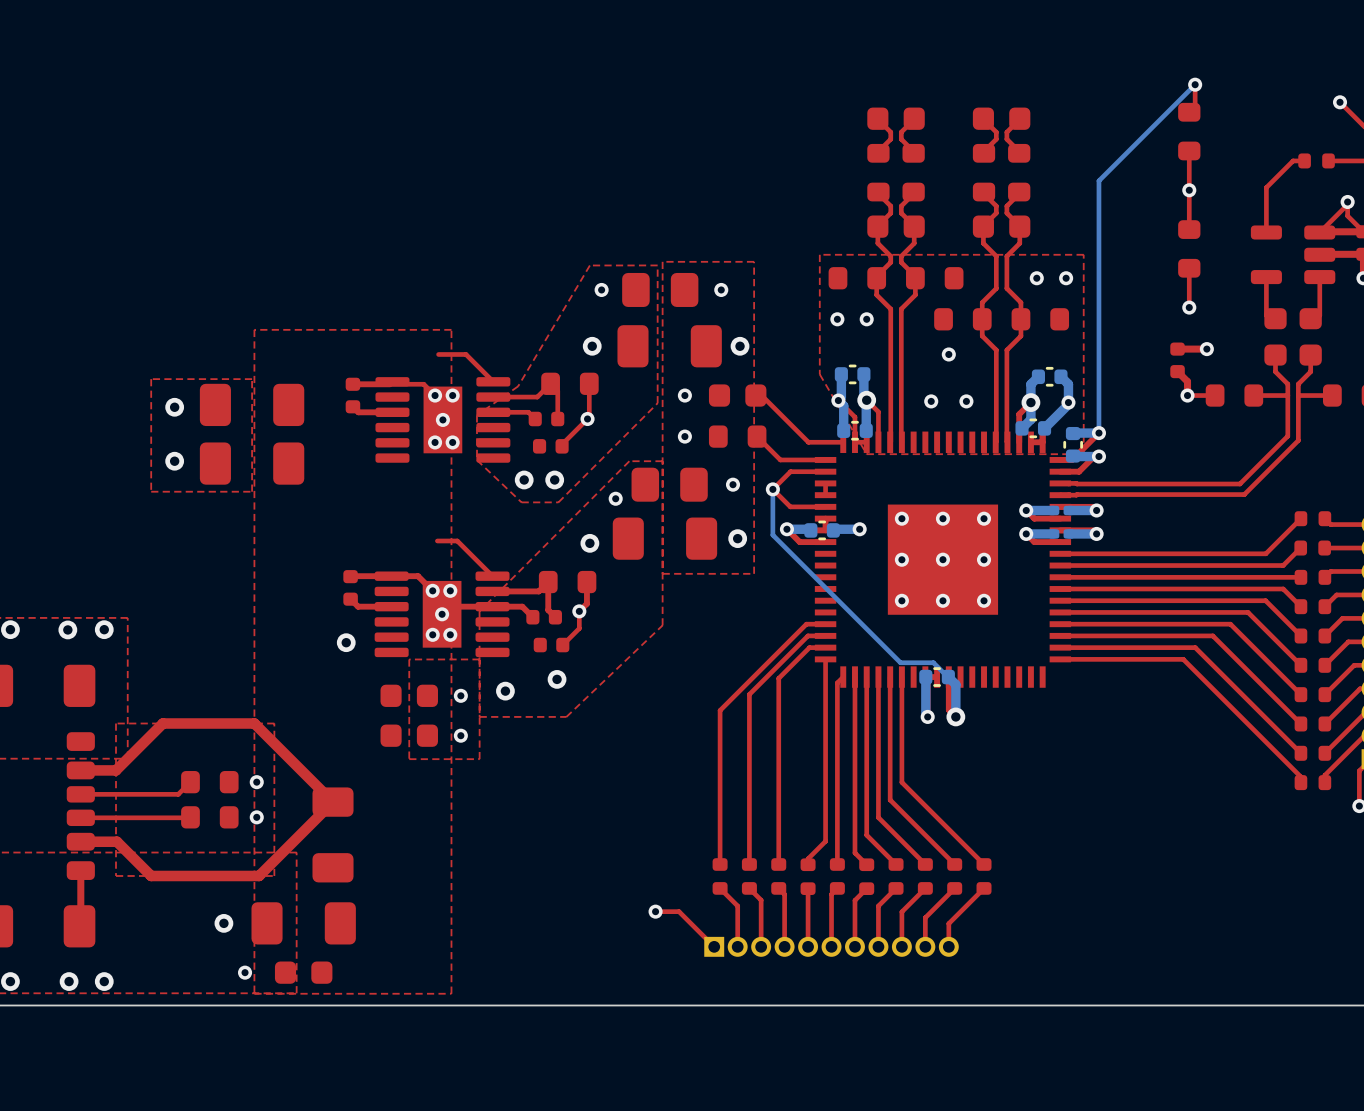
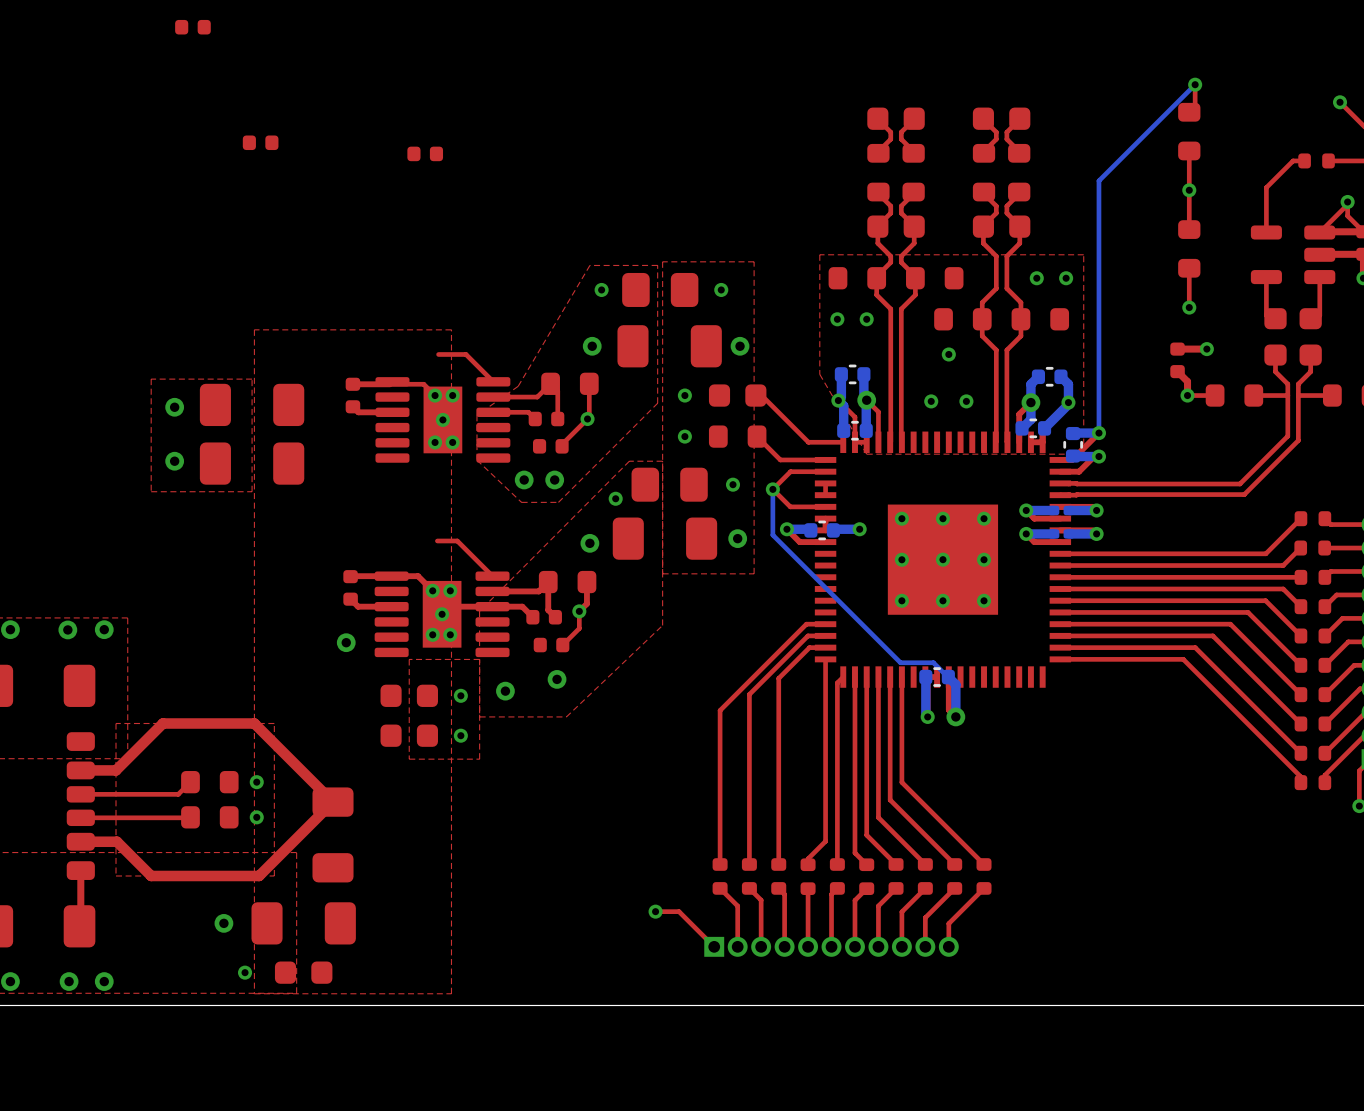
part: none -> (192, 27)
part: none -> (260, 142)
part: none -> (425, 153)

